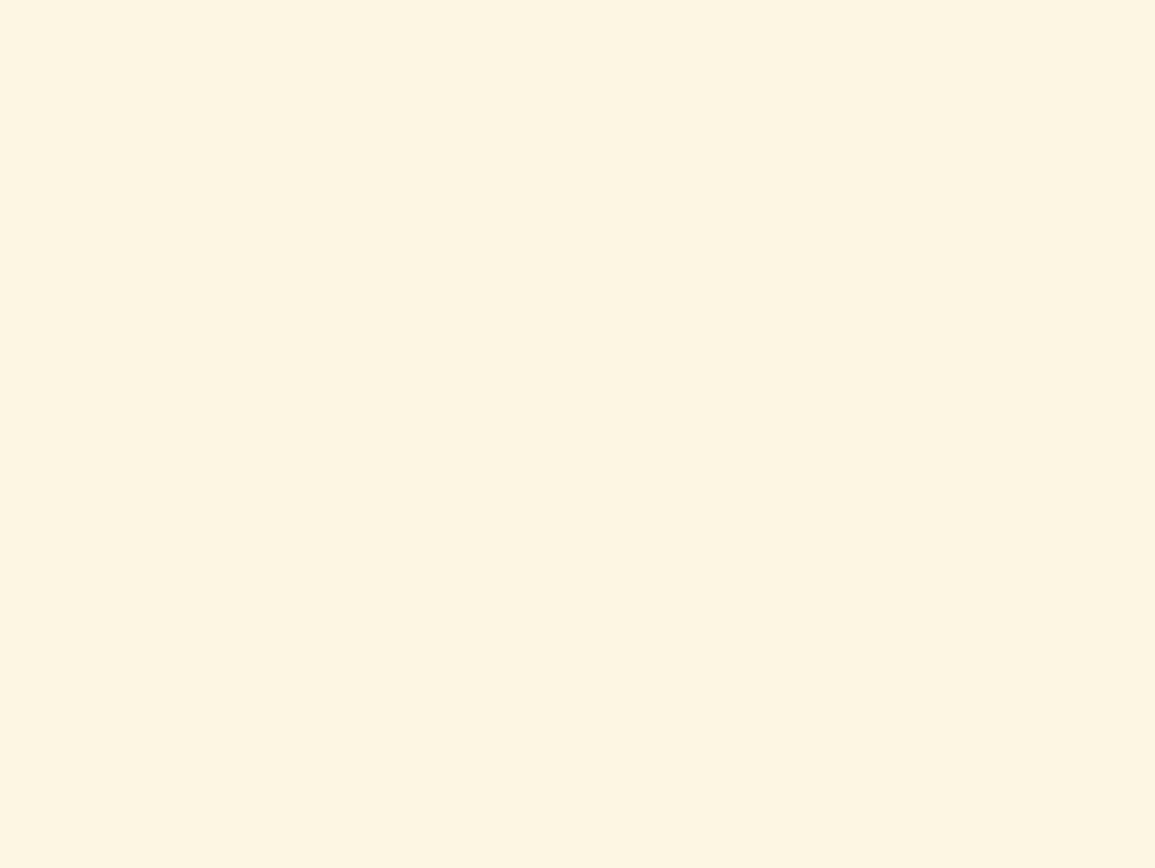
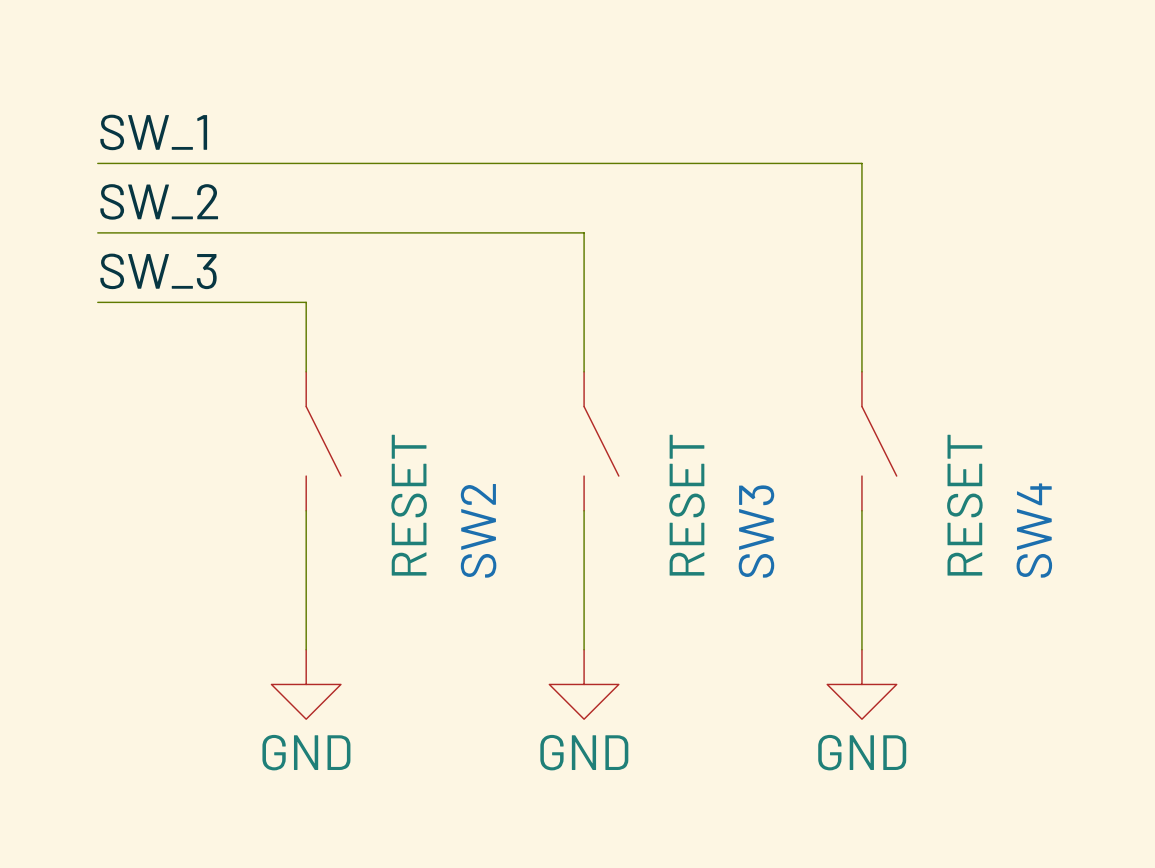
label: none -> SW_1 (153, 132)
wire: none -> (97, 163) (861, 163) (861, 371)
label: none -> SW_2 (159, 201)
wire: none -> (97, 232) (584, 232) (584, 371)
label: none -> SW_3 (158, 271)
wire: none -> (97, 302) (306, 302) (306, 371)
SW2: none -> RESET (323, 441)
SW3: none -> RESET (601, 441)
SW4: none -> RESET (879, 441)
wire: none -> (306, 510) (306, 649)
wire: none -> (584, 510) (584, 649)
wire: none -> (861, 510) (861, 649)
power symbol: none -> GND (306, 684)
power symbol: none -> GND (584, 684)
power symbol: none -> GND (861, 684)

